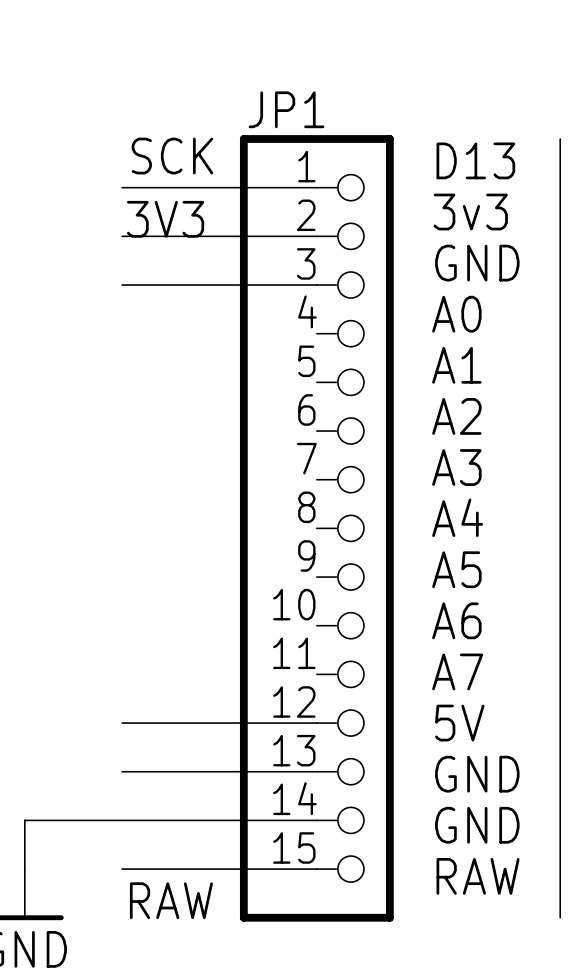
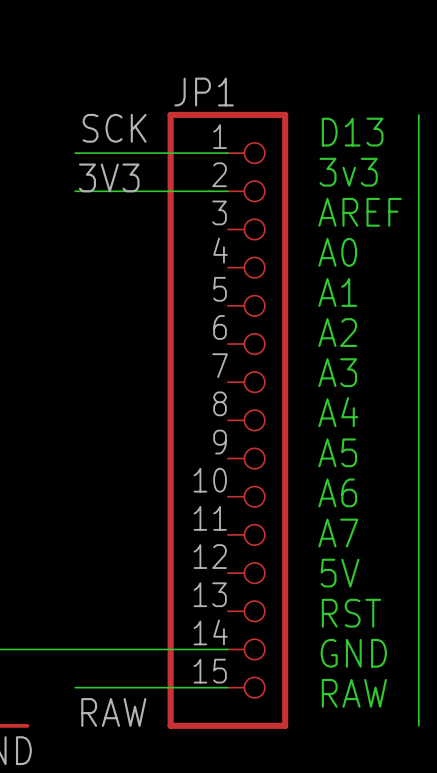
text: GND (477, 263) -> AREF (360, 212)
wire: (122, 285) (316, 285) -> none
wire: (122, 723) (316, 723) -> none
wire: (122, 771) (316, 771) -> none
text: GND (477, 774) -> RST (351, 613)

